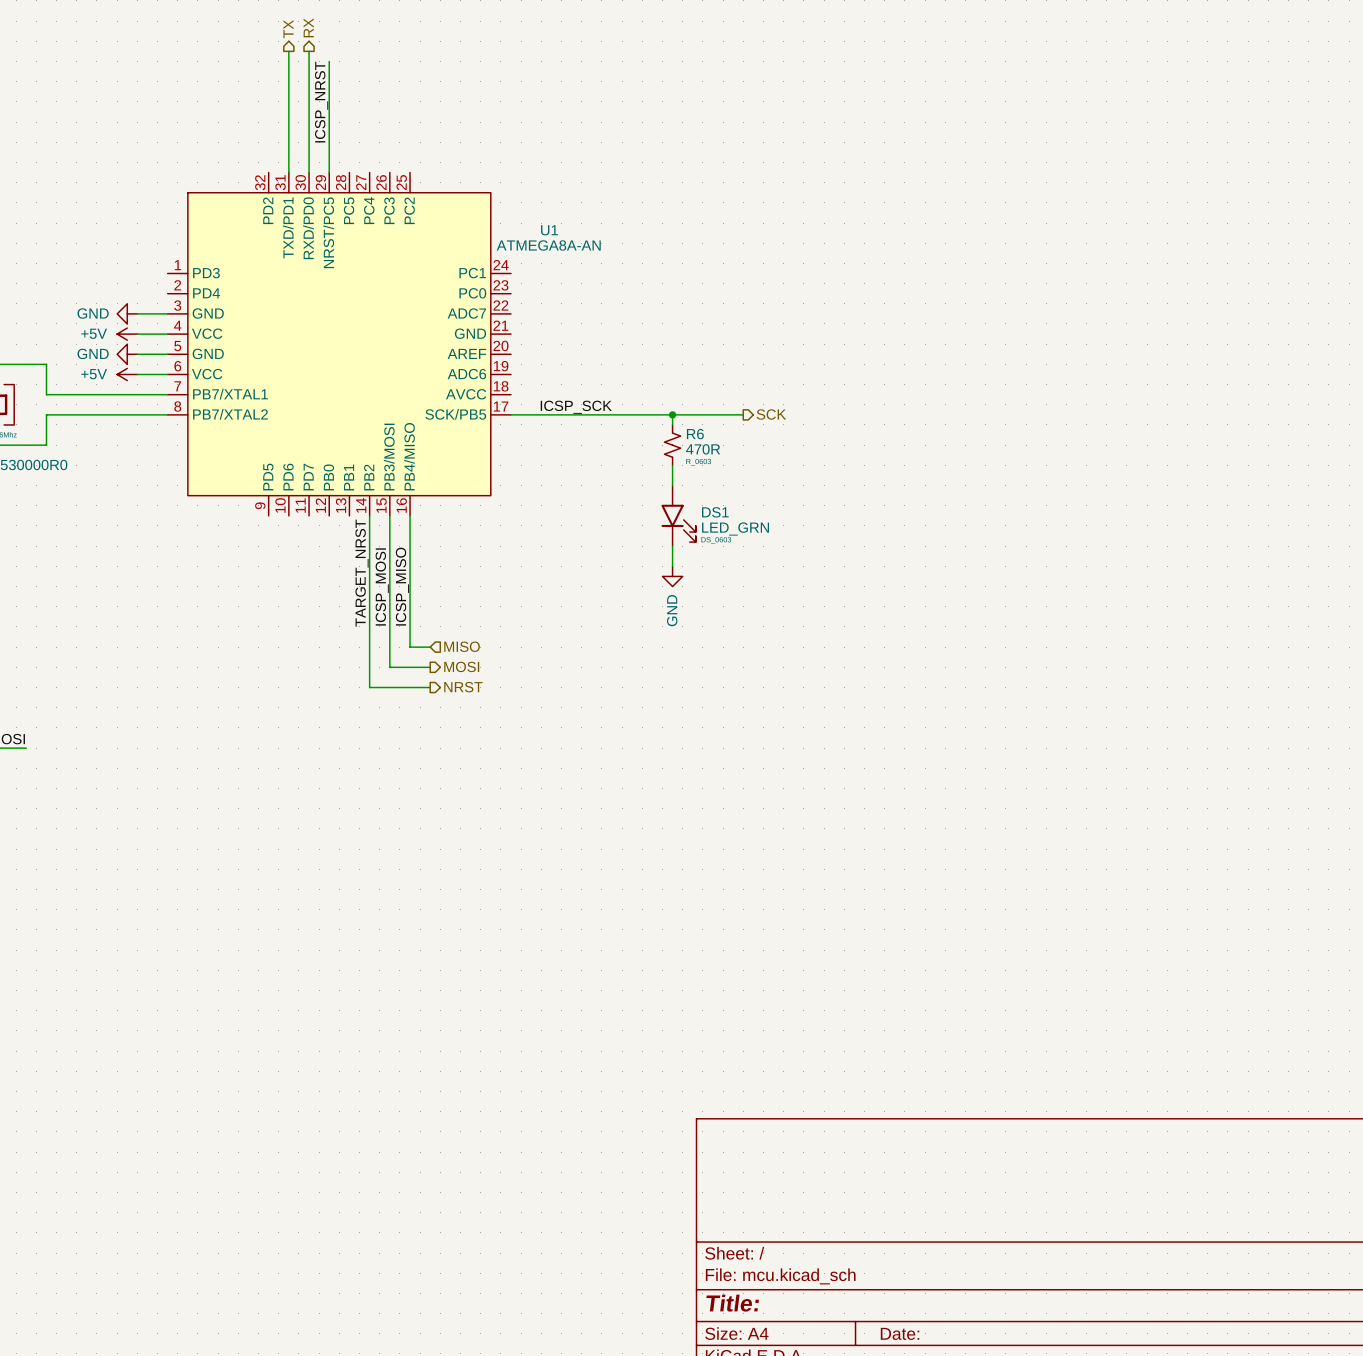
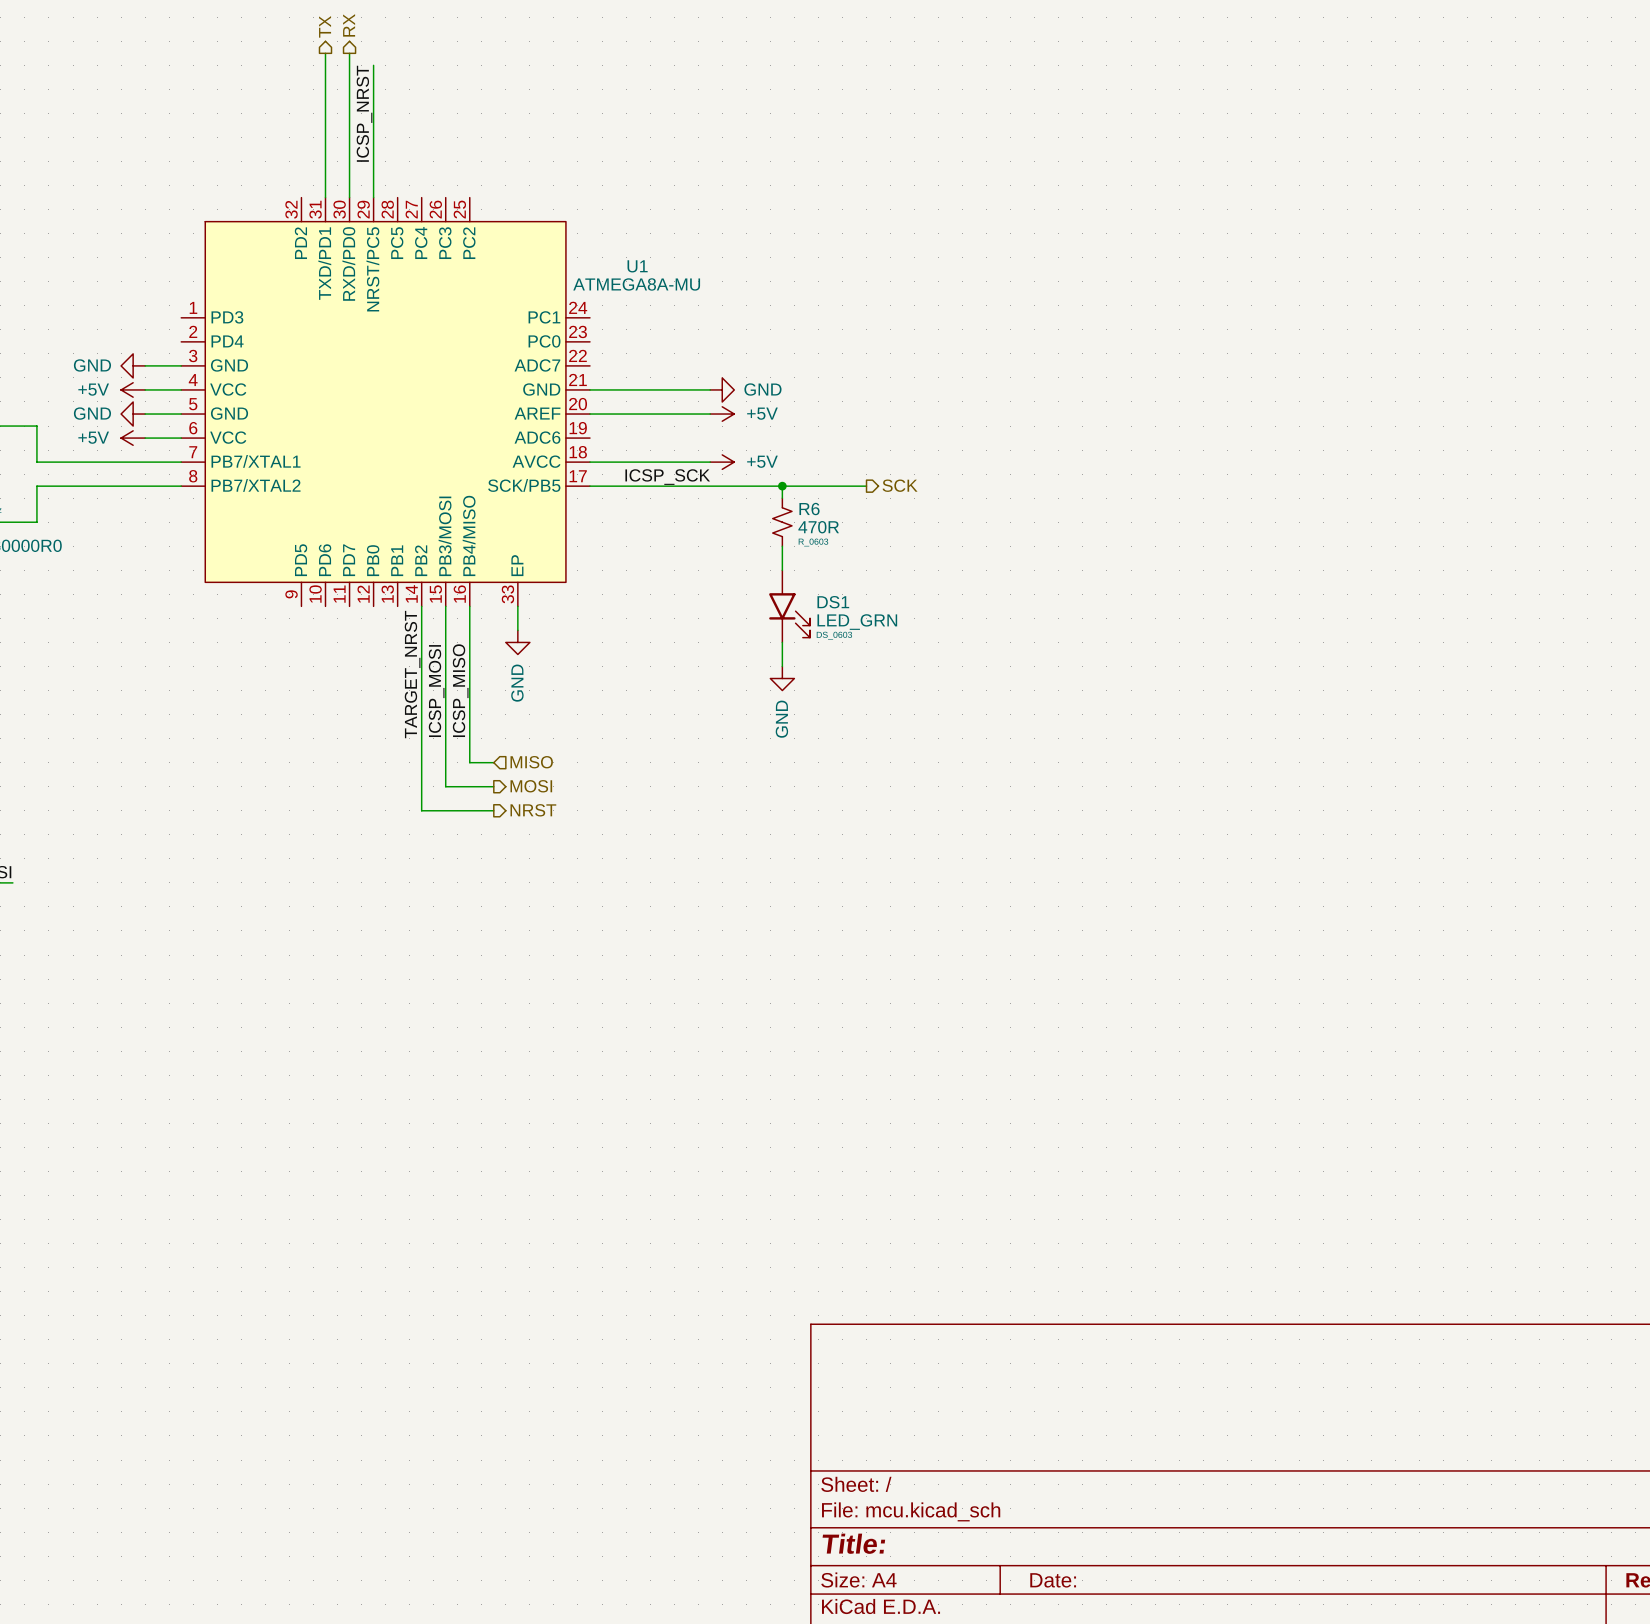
U1 symbol: [167, 172, 512, 516] -> [181, 197, 591, 607]
U1 value: ATMEGA8A-AN (548, 245) -> ATMEGA8A-MU (636, 284)
wire: none -> (590, 389) (710, 389)
power symbol: none -> GND (722, 389)
wire: none -> (590, 414) (710, 414)
power symbol: none -> +5V (722, 414)
wire: none -> (590, 462) (710, 462)
power symbol: none -> +5V (722, 462)
wire: none -> (517, 606) (517, 630)
power symbol: none -> GND (517, 642)

